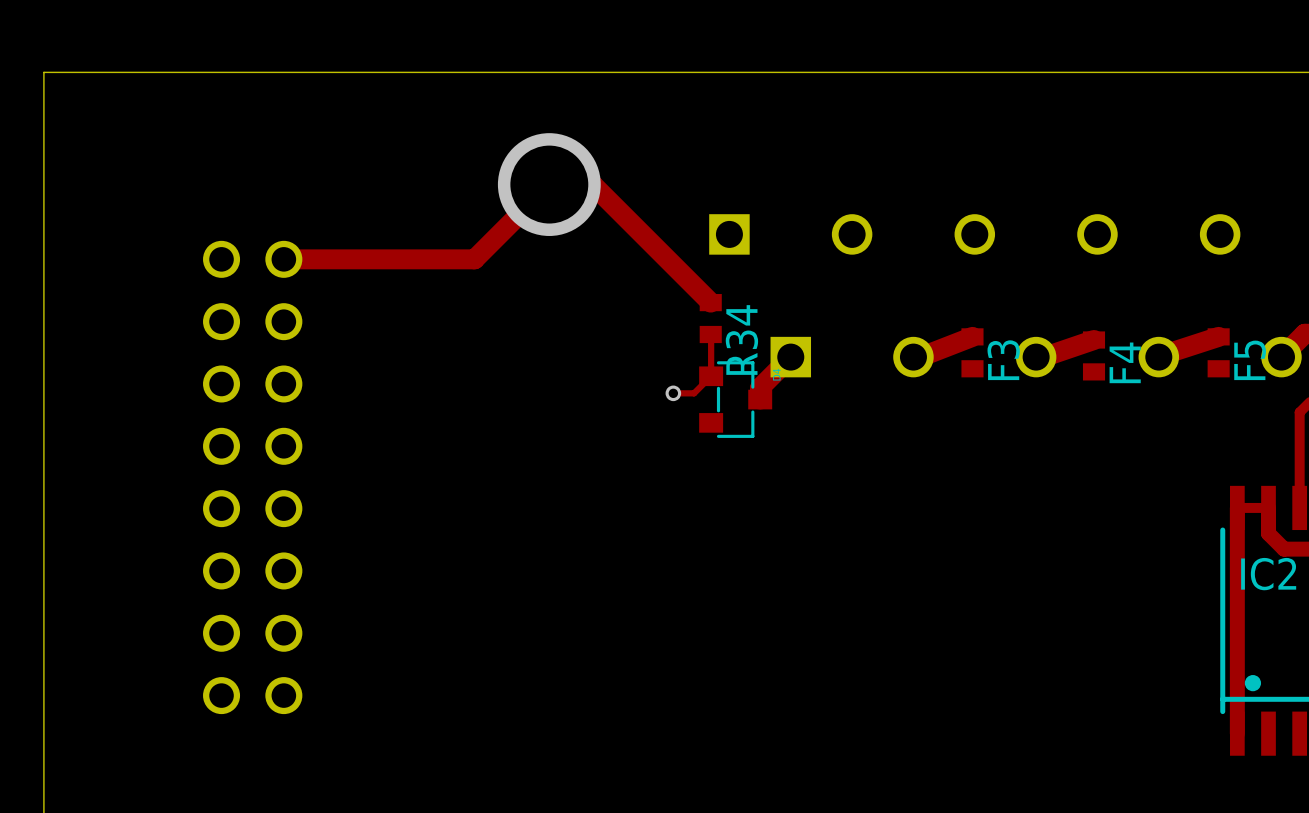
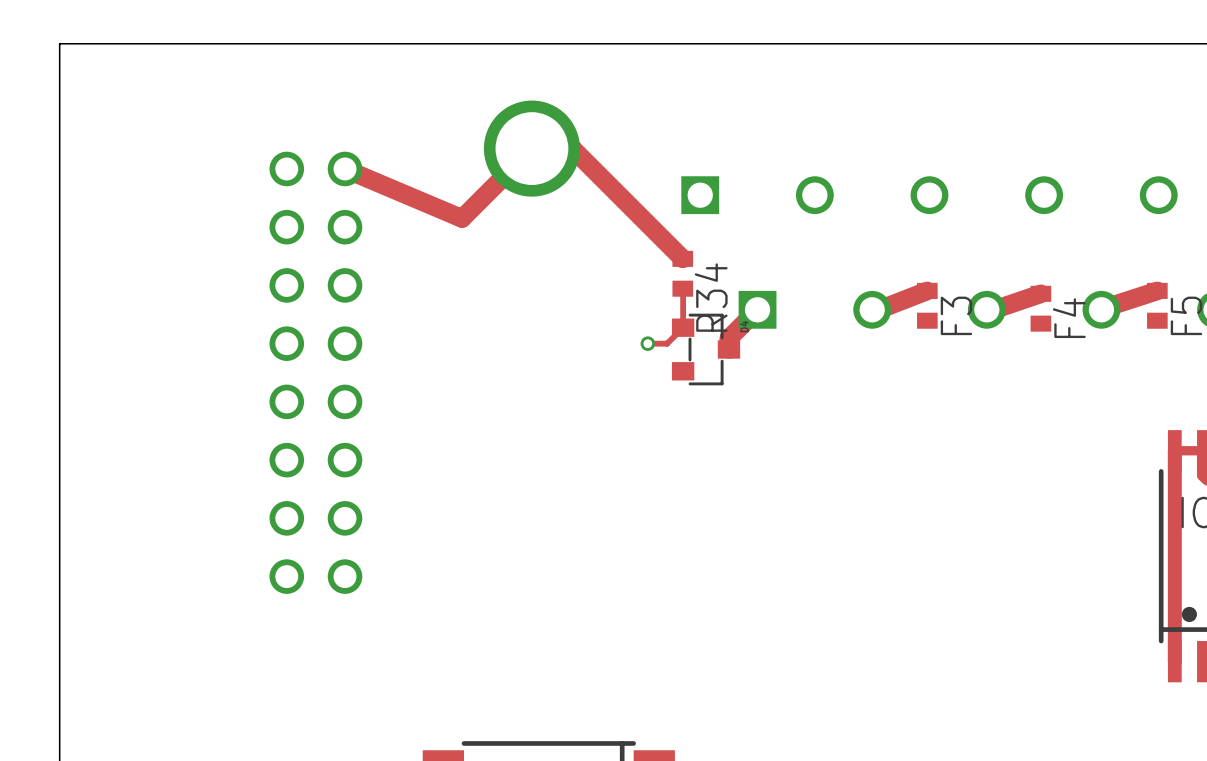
track: (283, 259) (474, 259) -> (345, 168) (462, 218)
part position: (252, 477) -> (315, 372)

